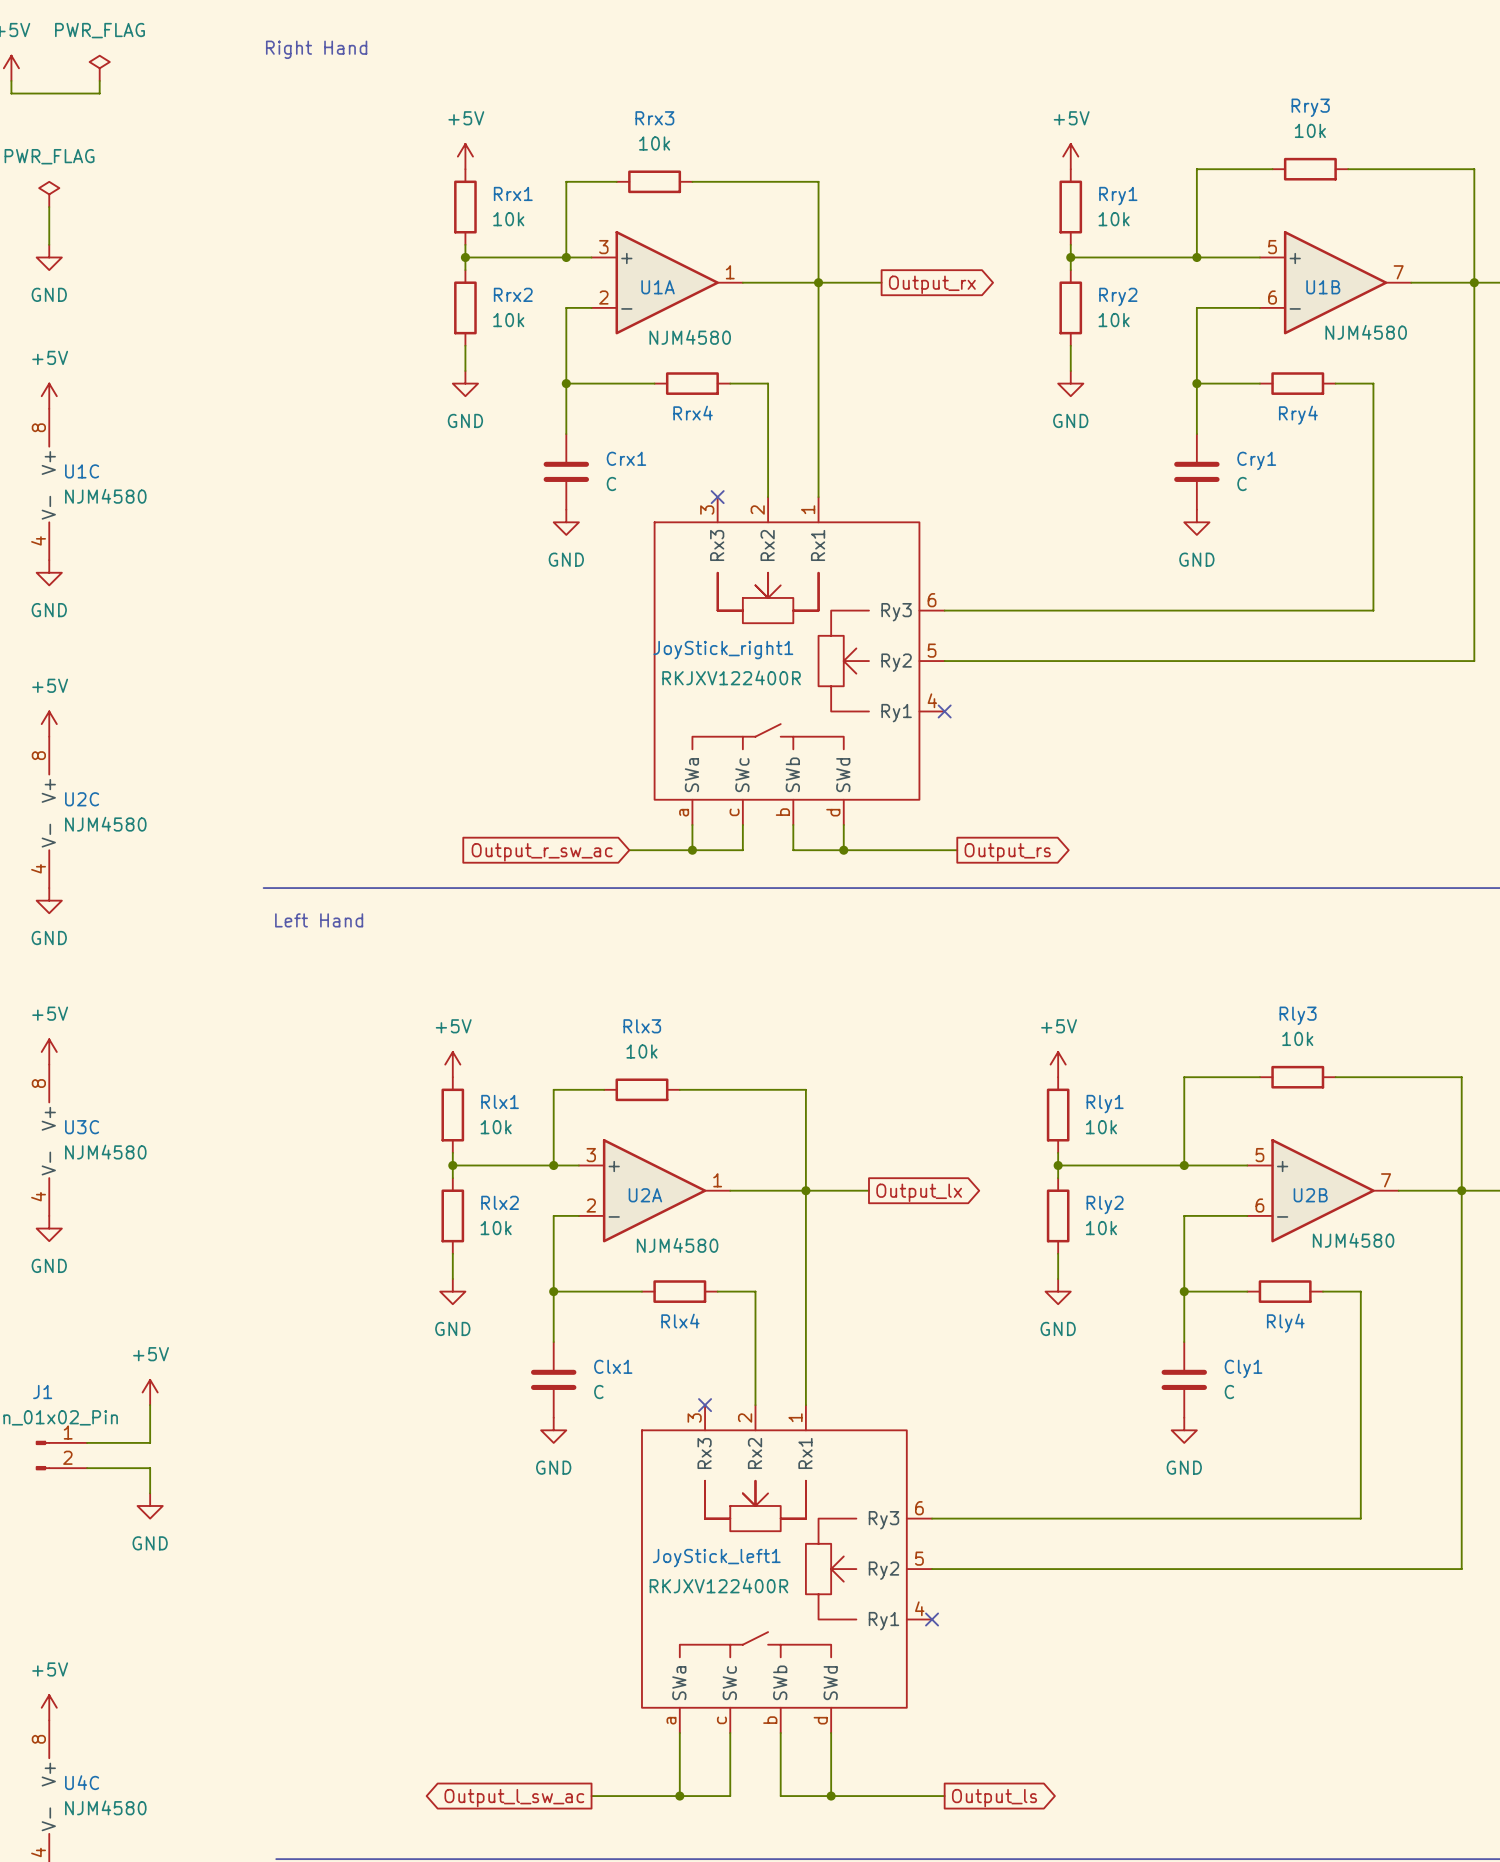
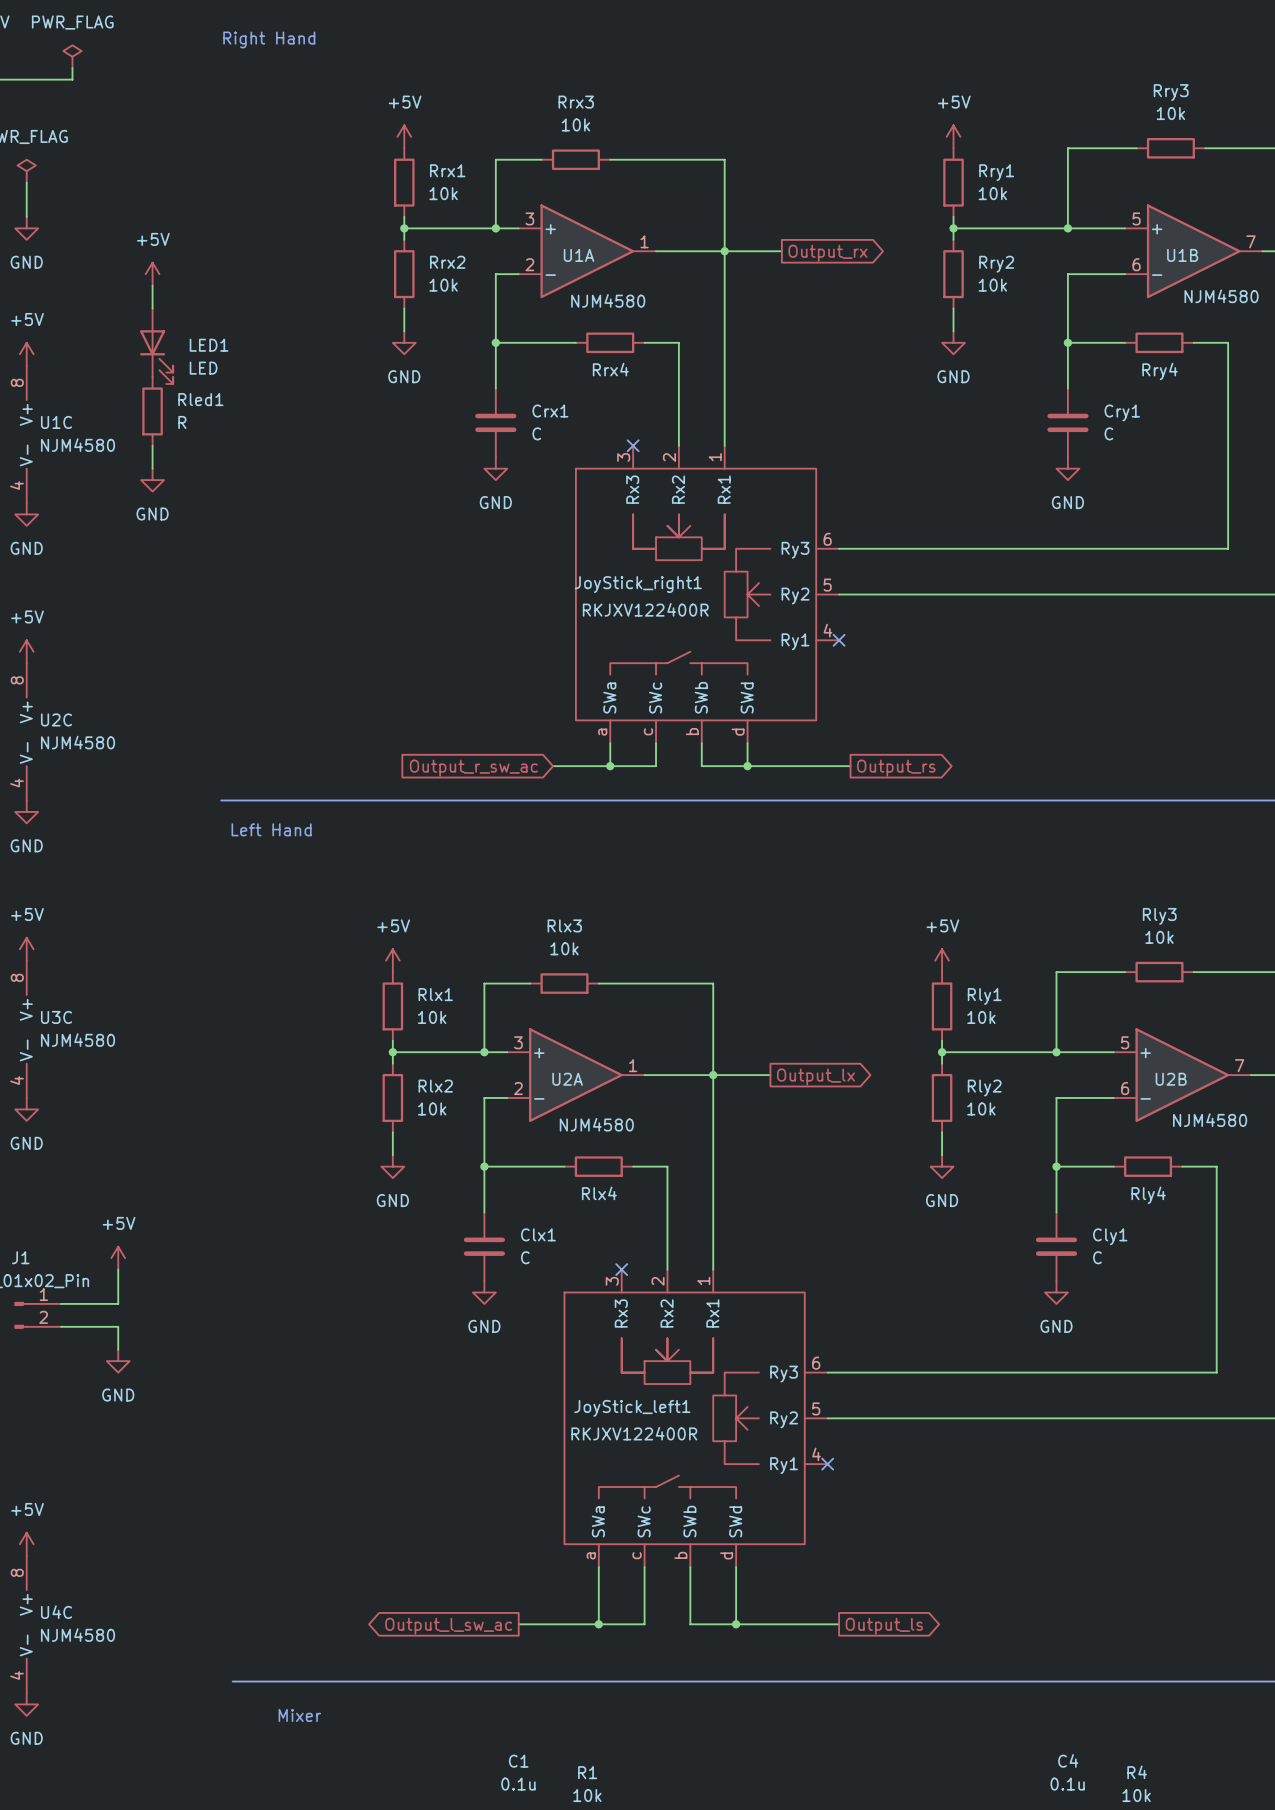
power symbol: none -> +5V (152, 274)
wire: none -> (152, 285) (152, 308)
LED1: none -> LED (156, 346)
Rled1: none -> R (152, 411)
wire: none -> (152, 445) (152, 468)
power symbol: none -> GND (152, 480)

